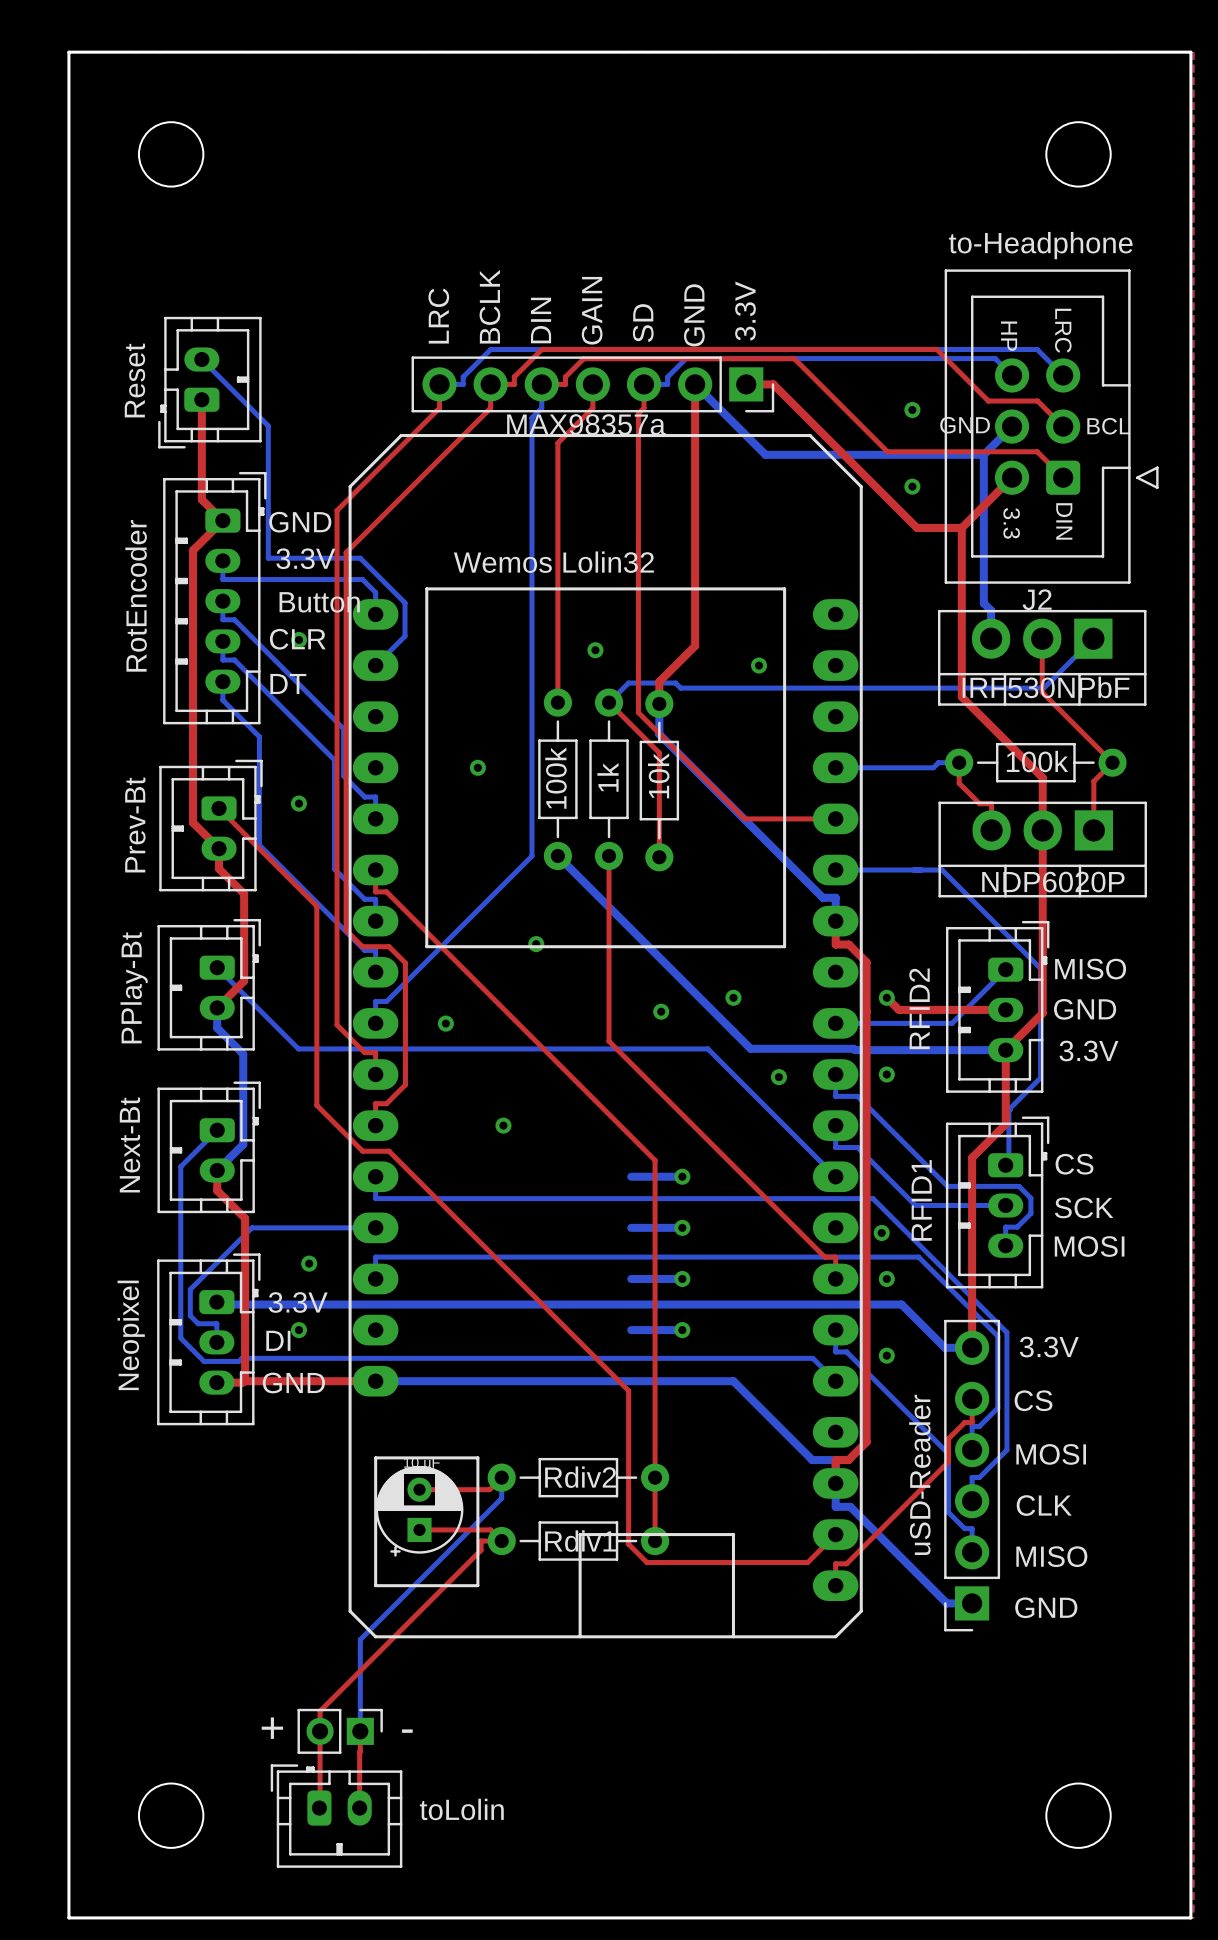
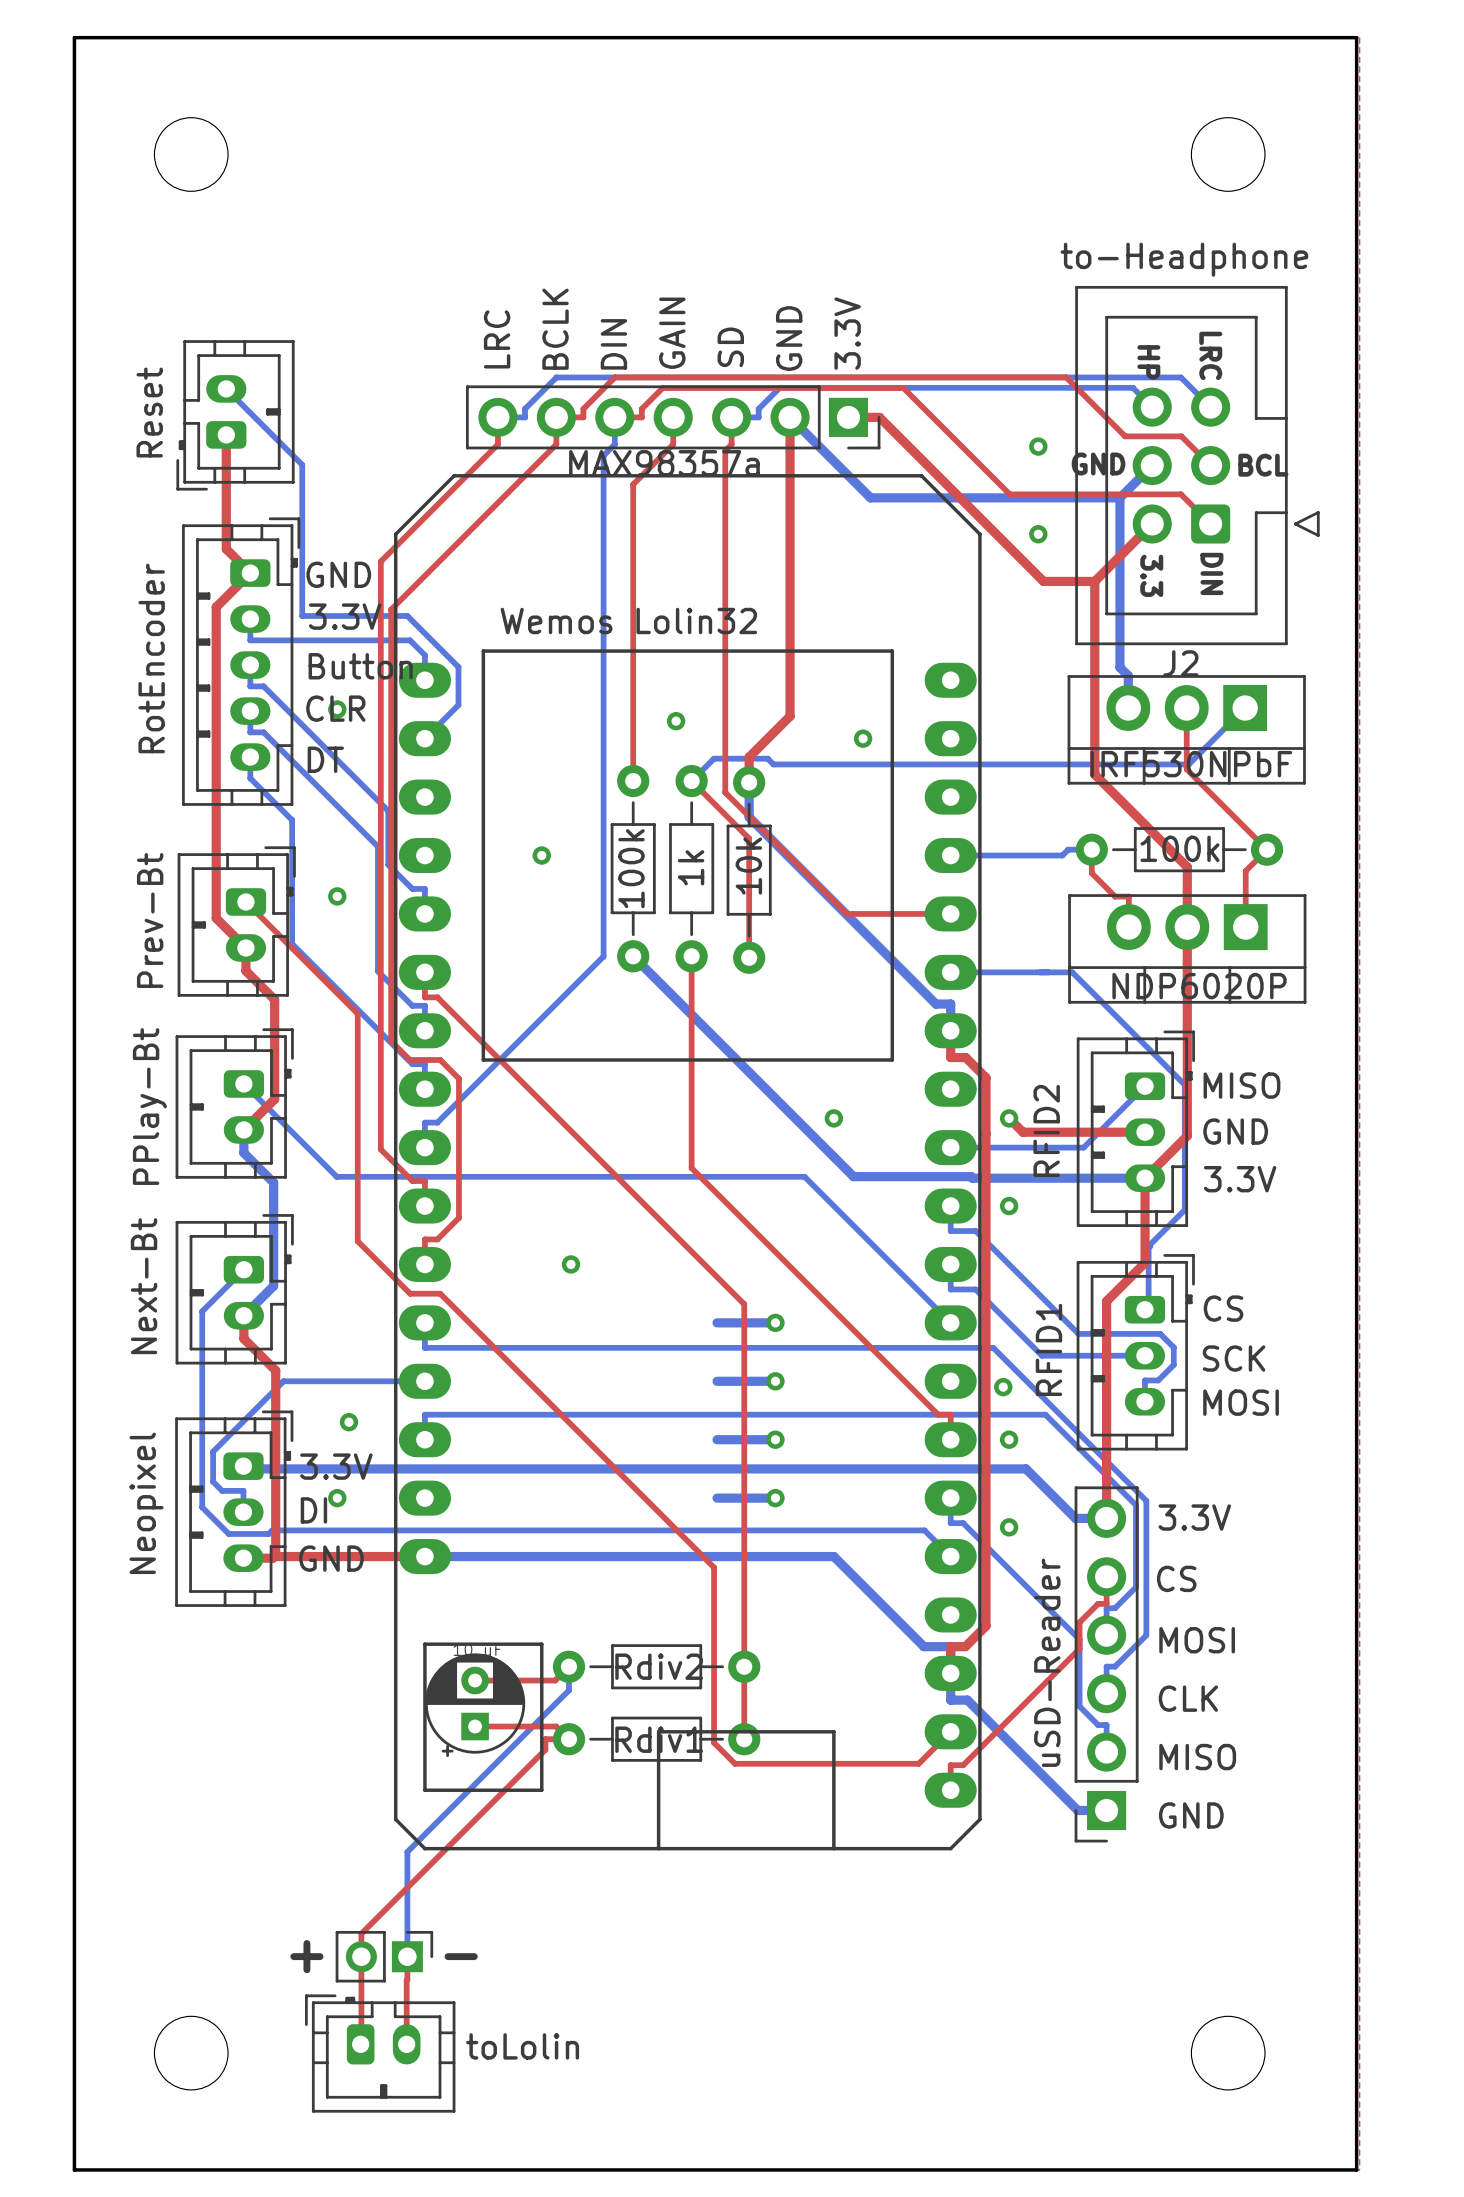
via: (536, 944) -> none
via: (661, 1011) -> none
via: (445, 1023) -> none
via: (778, 1077) -> none

